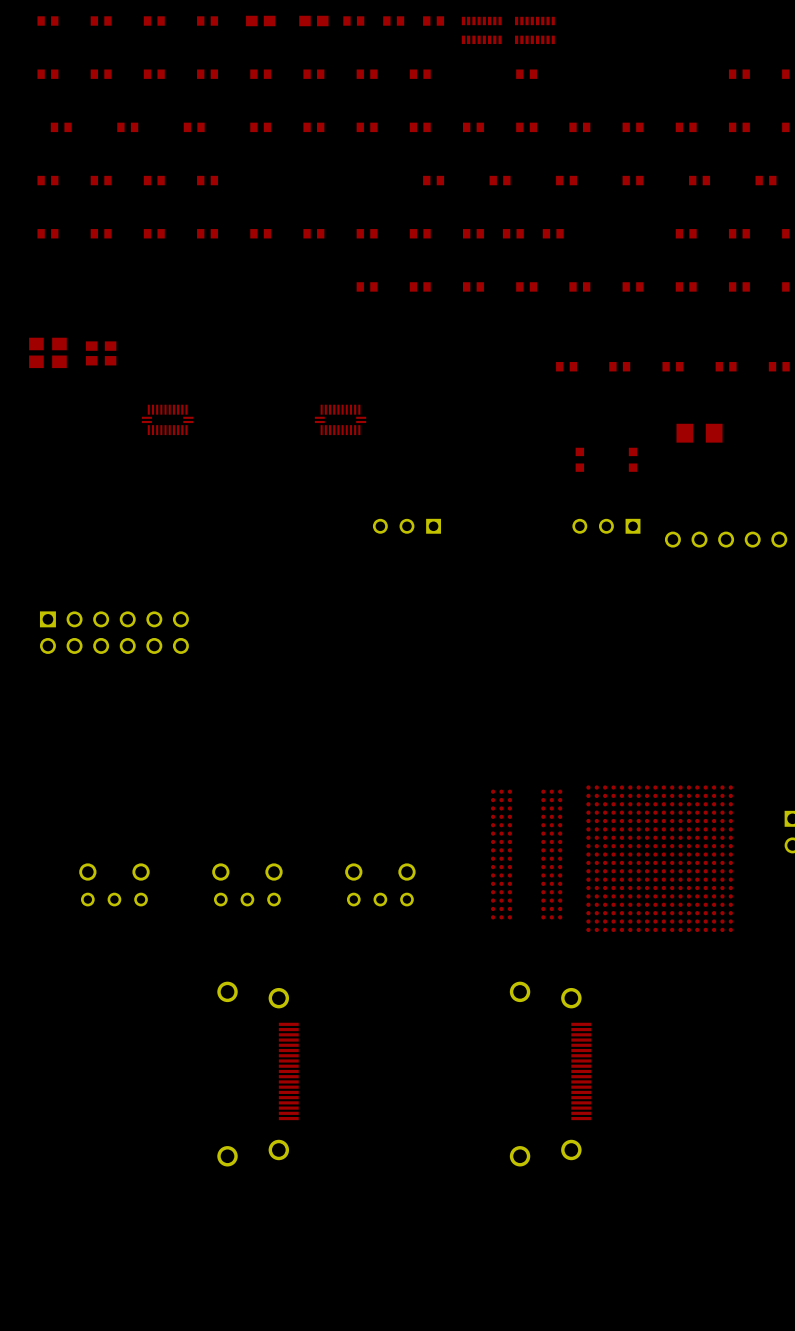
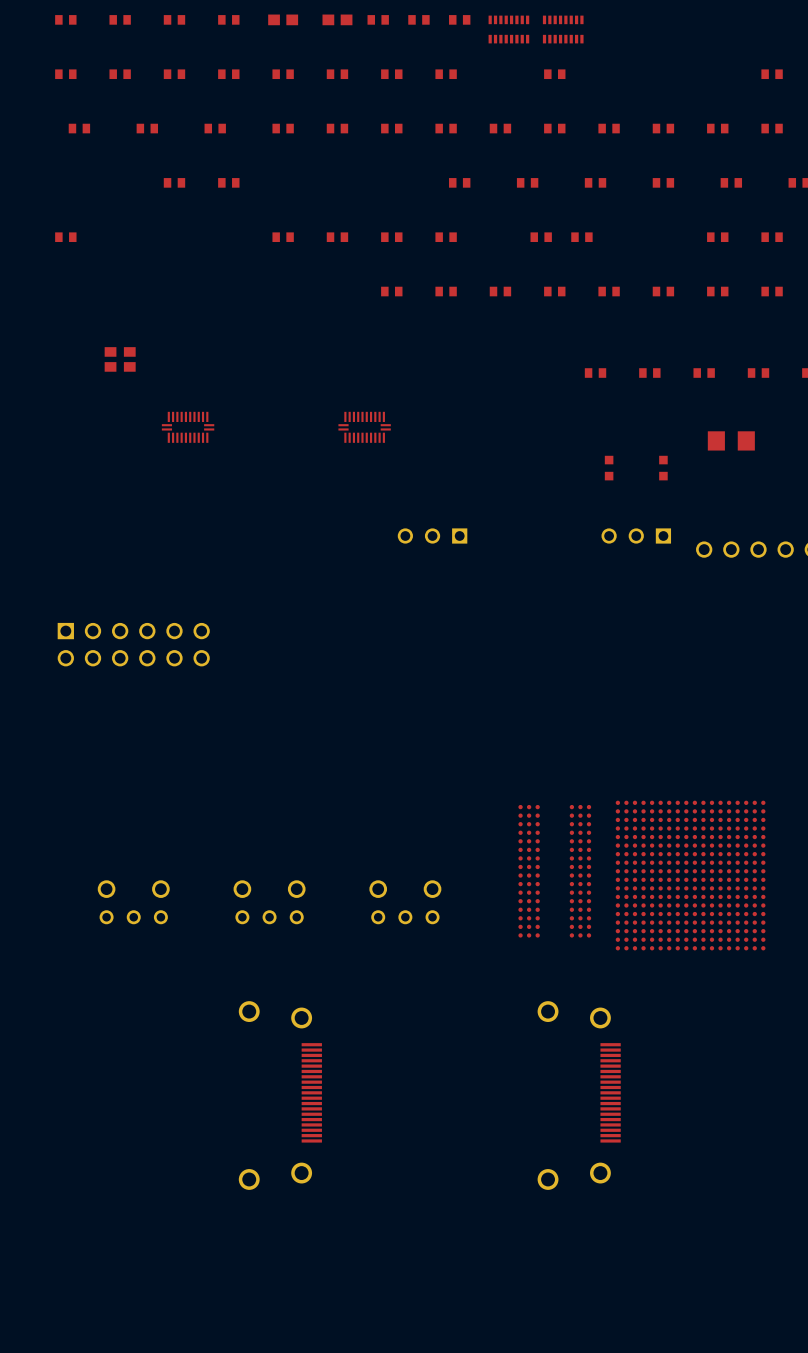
part: (47, 180) -> none
part: (101, 180) -> none
part: (101, 233) -> none
part: (154, 233) -> none
part: (207, 233) -> none
part: (473, 233) -> none
part: (47, 352) -> none

